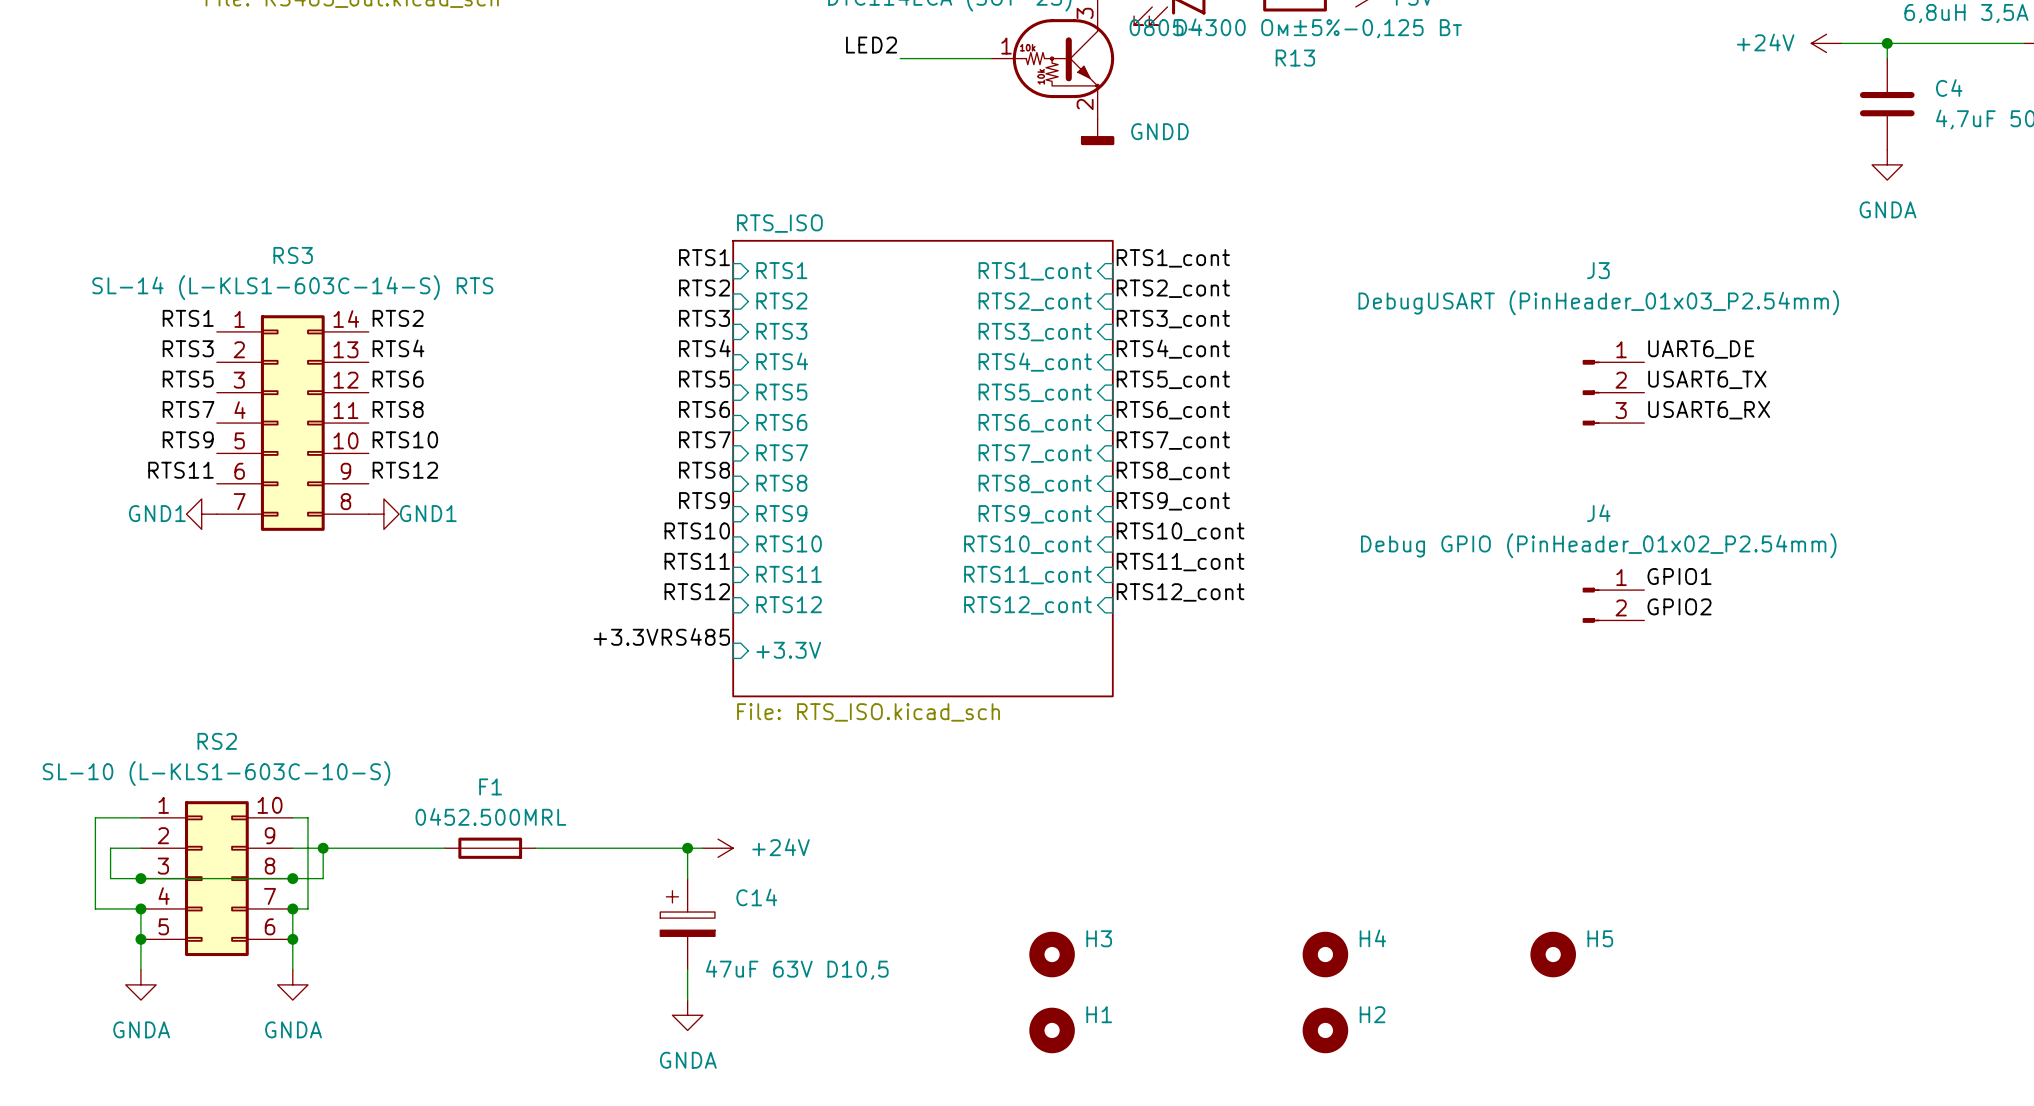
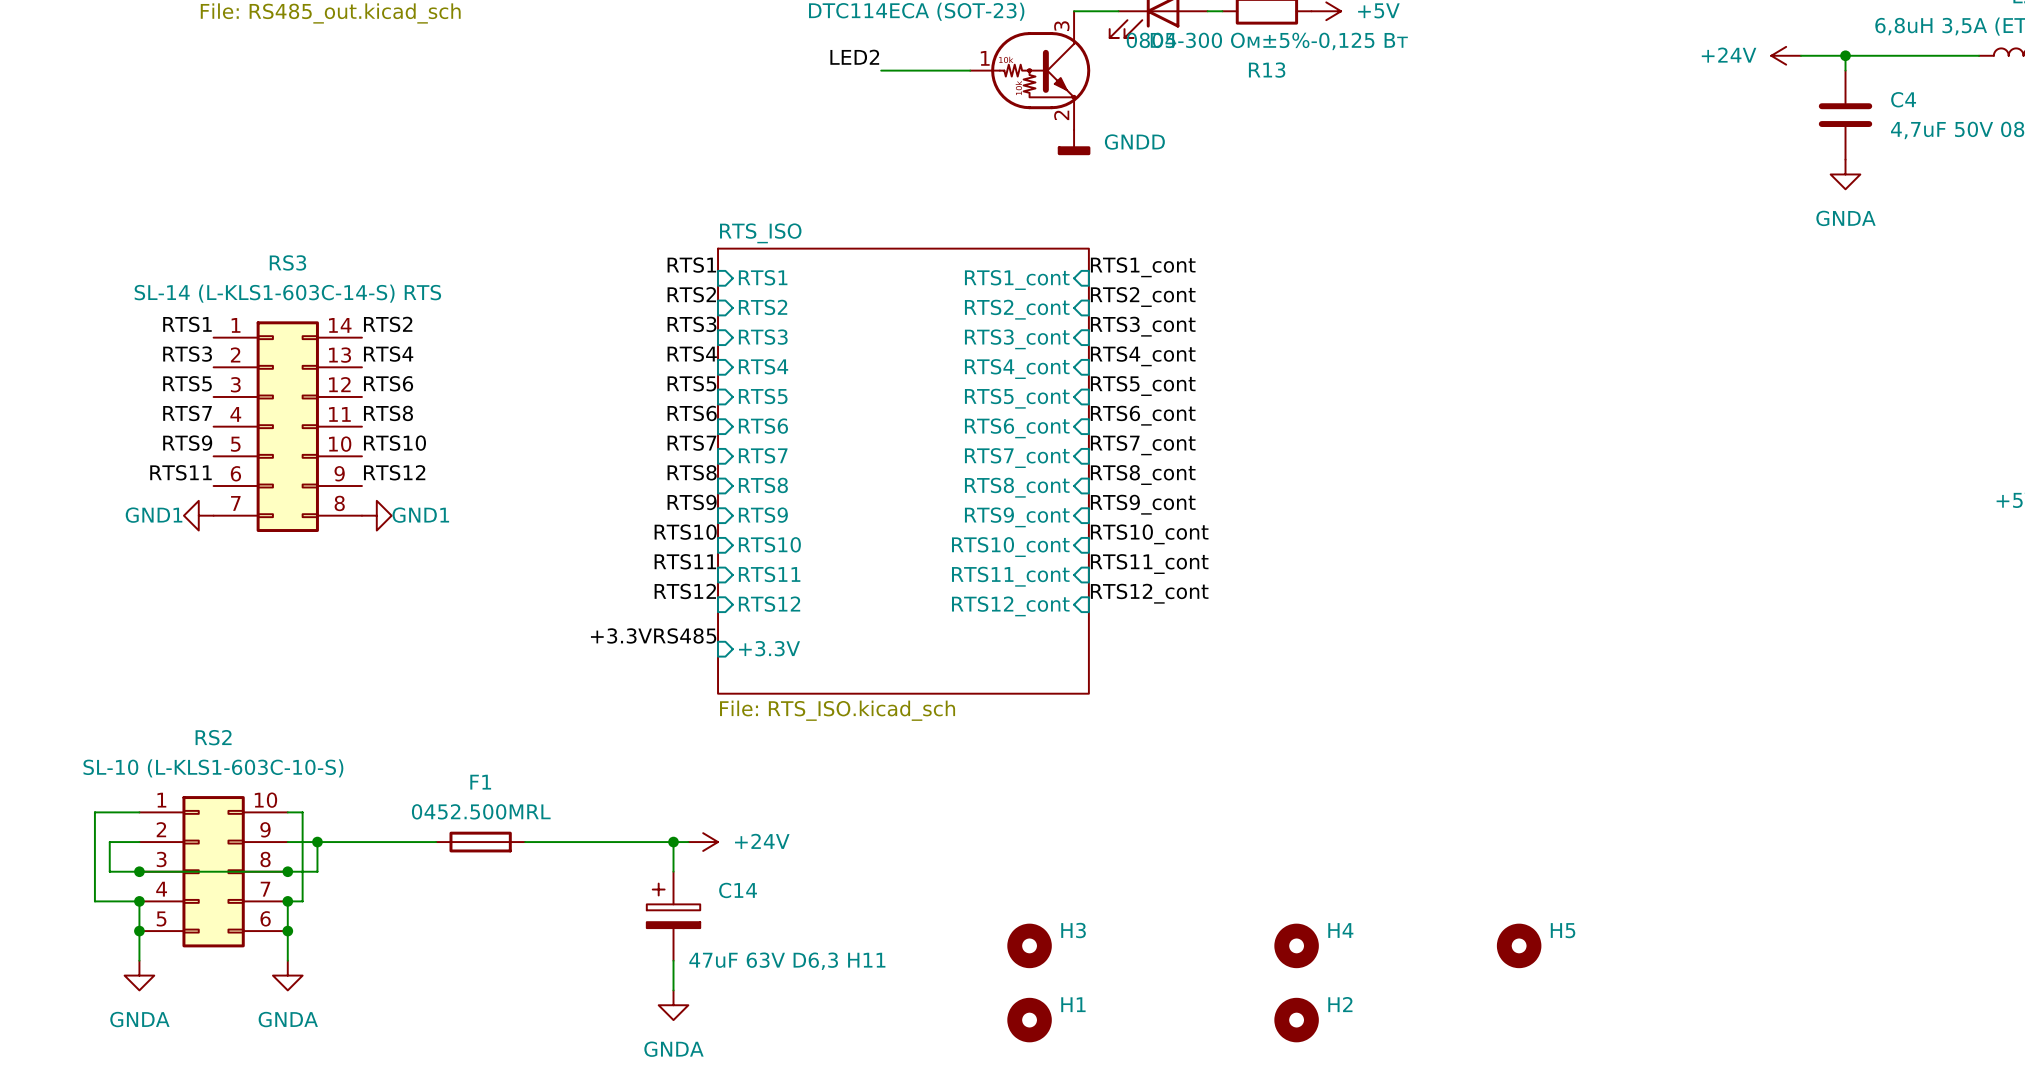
label: UART6_DE (1701, 349) -> none
label: USART6_TX (1707, 379) -> none
J3: DebugUSART (PinHeader_01x03_P2.54mm) (1613, 392) -> none
label: USART6_RX (1709, 410) -> none
label: GPIO1 (1679, 576) -> none
J4: Debug GPIO (PinHeader_01x02_P2.54mm) (1613, 605) -> none
label: GPIO2 (1679, 606) -> none
C14 value: 47uF 63V D10,5 (797, 969) -> 47uF 63V D6,3 H11 (787, 961)

